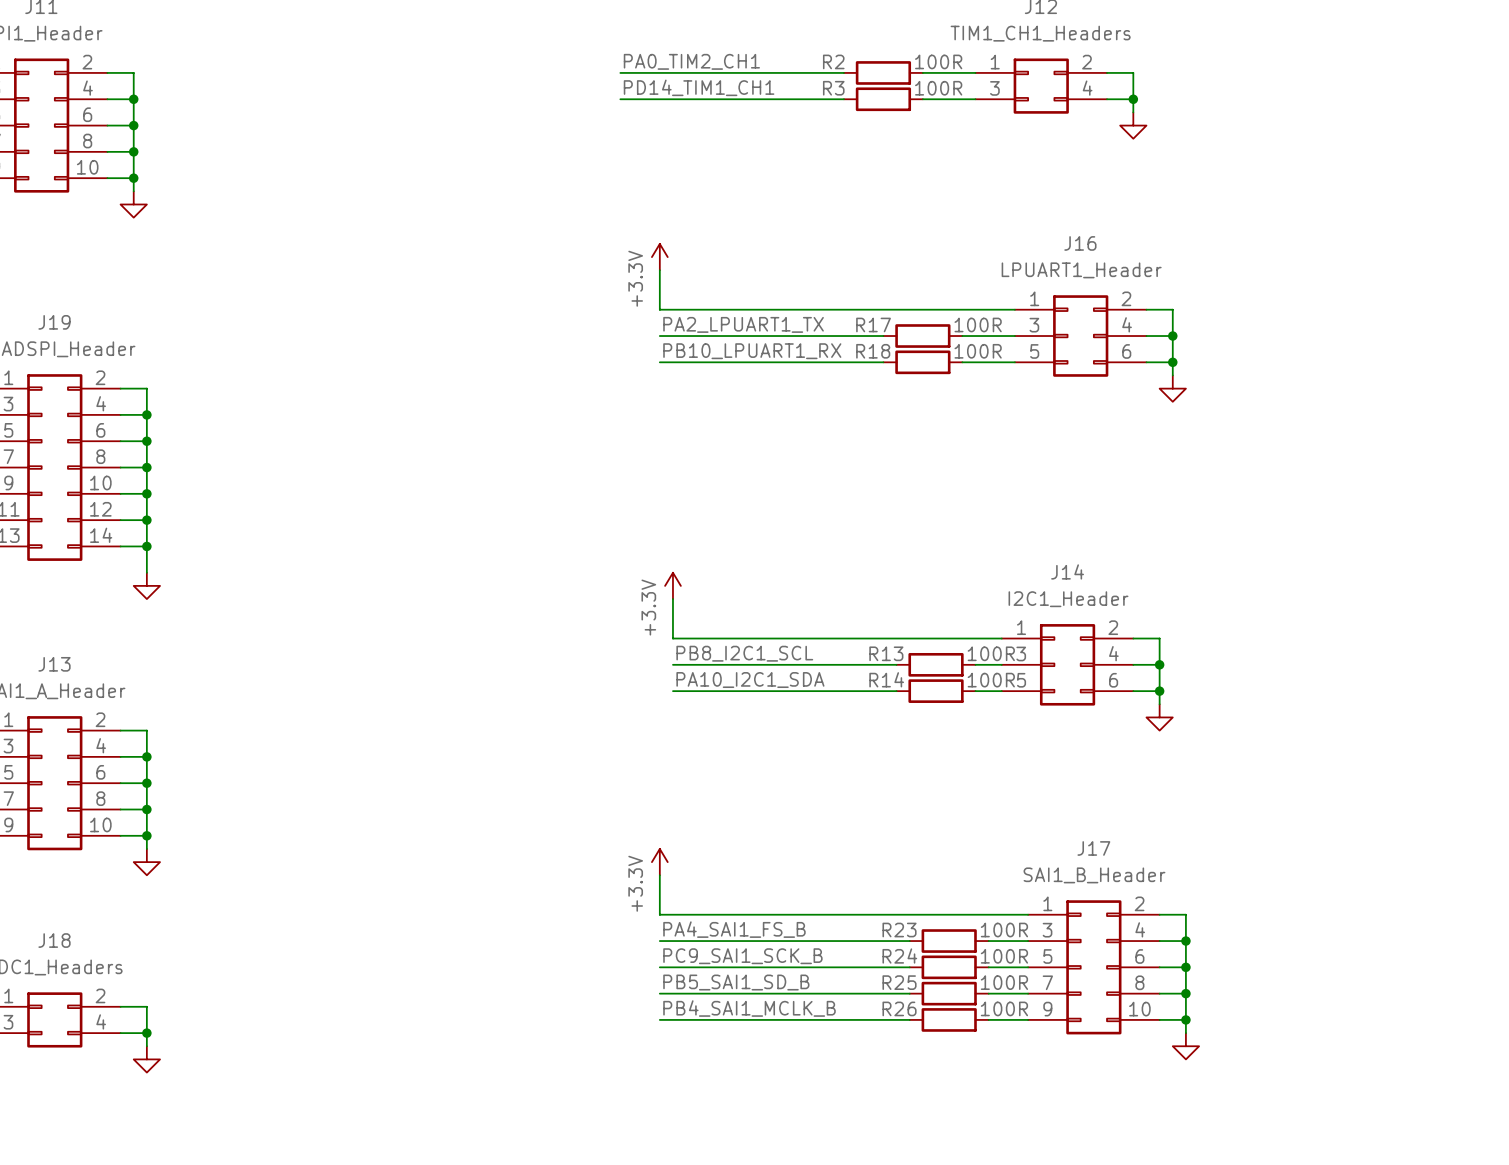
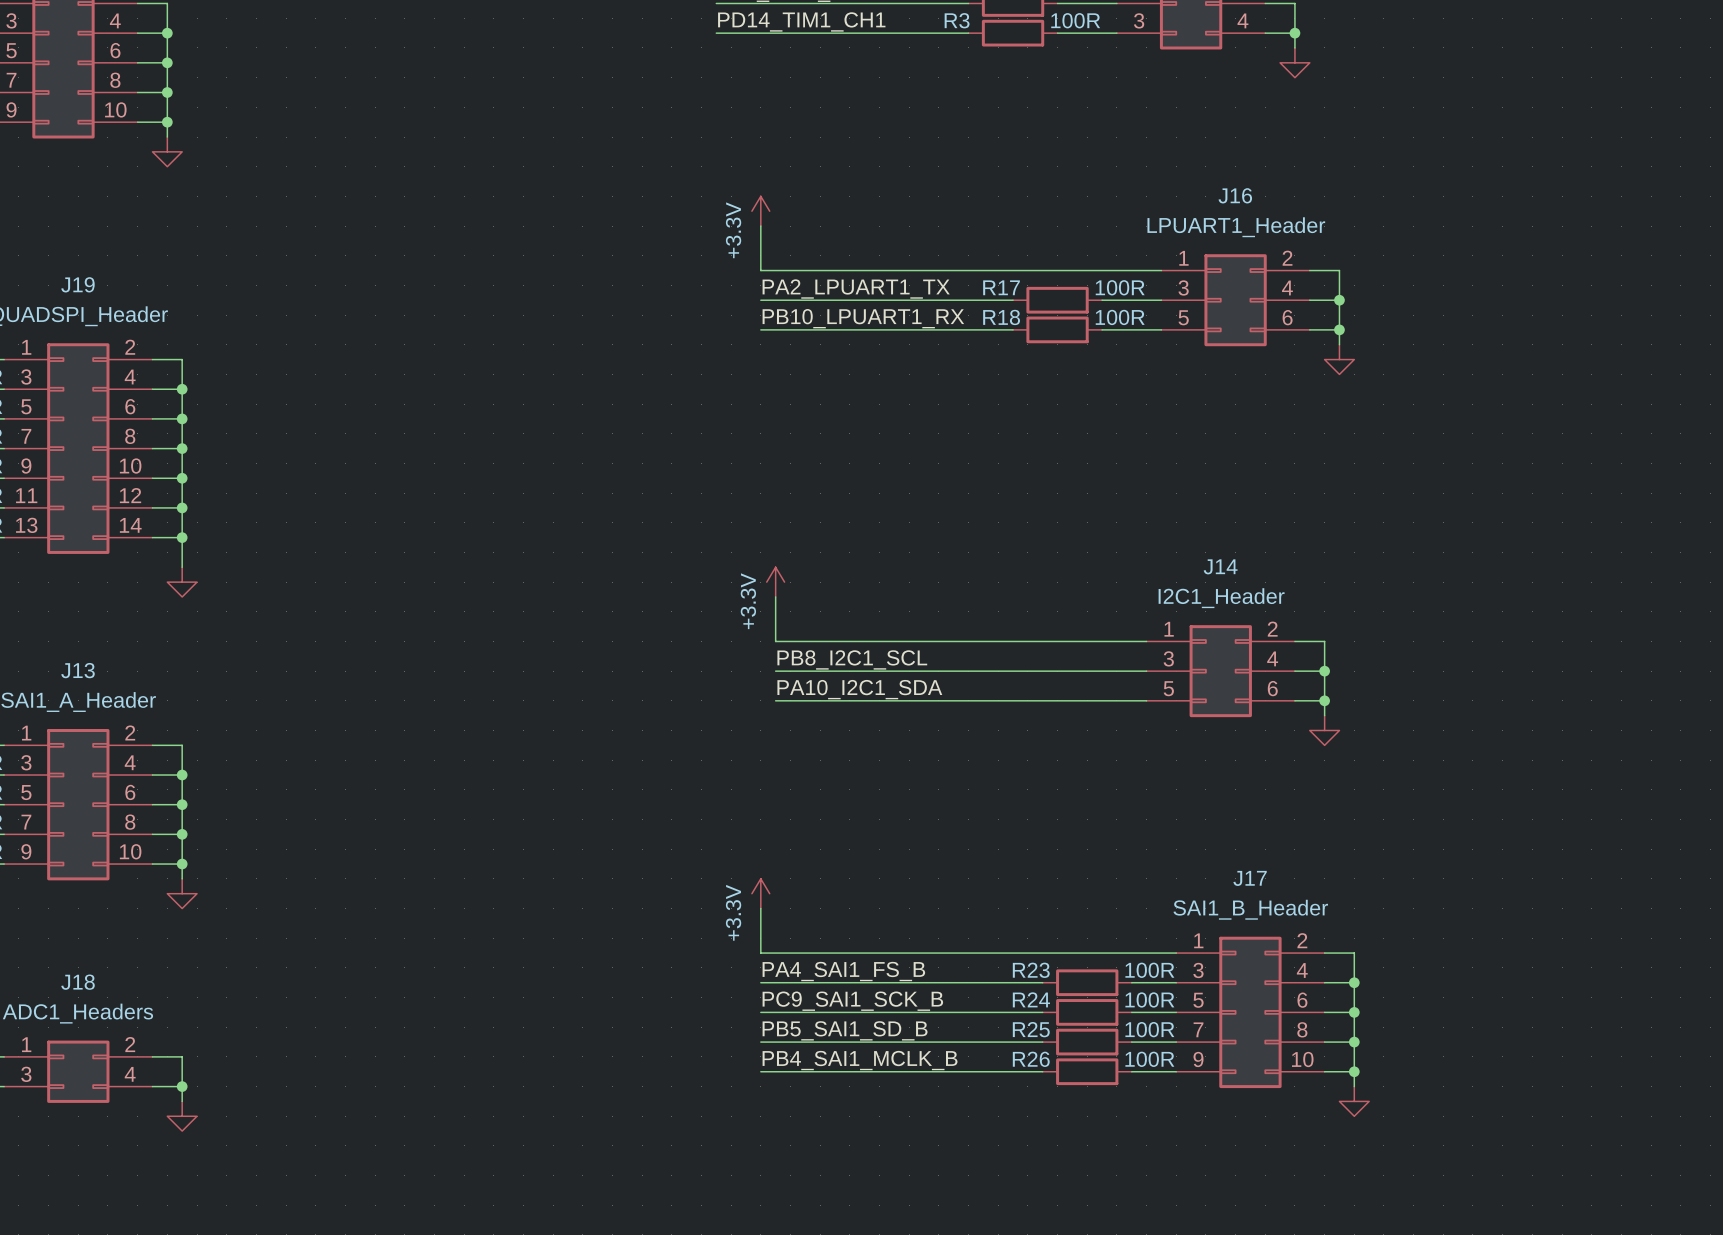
wire: none -> (1027, 671) (1116, 671)
R13: 100R (936, 664) -> none
wire: none -> (1027, 700) (1116, 700)
R14: 100R (936, 691) -> none

